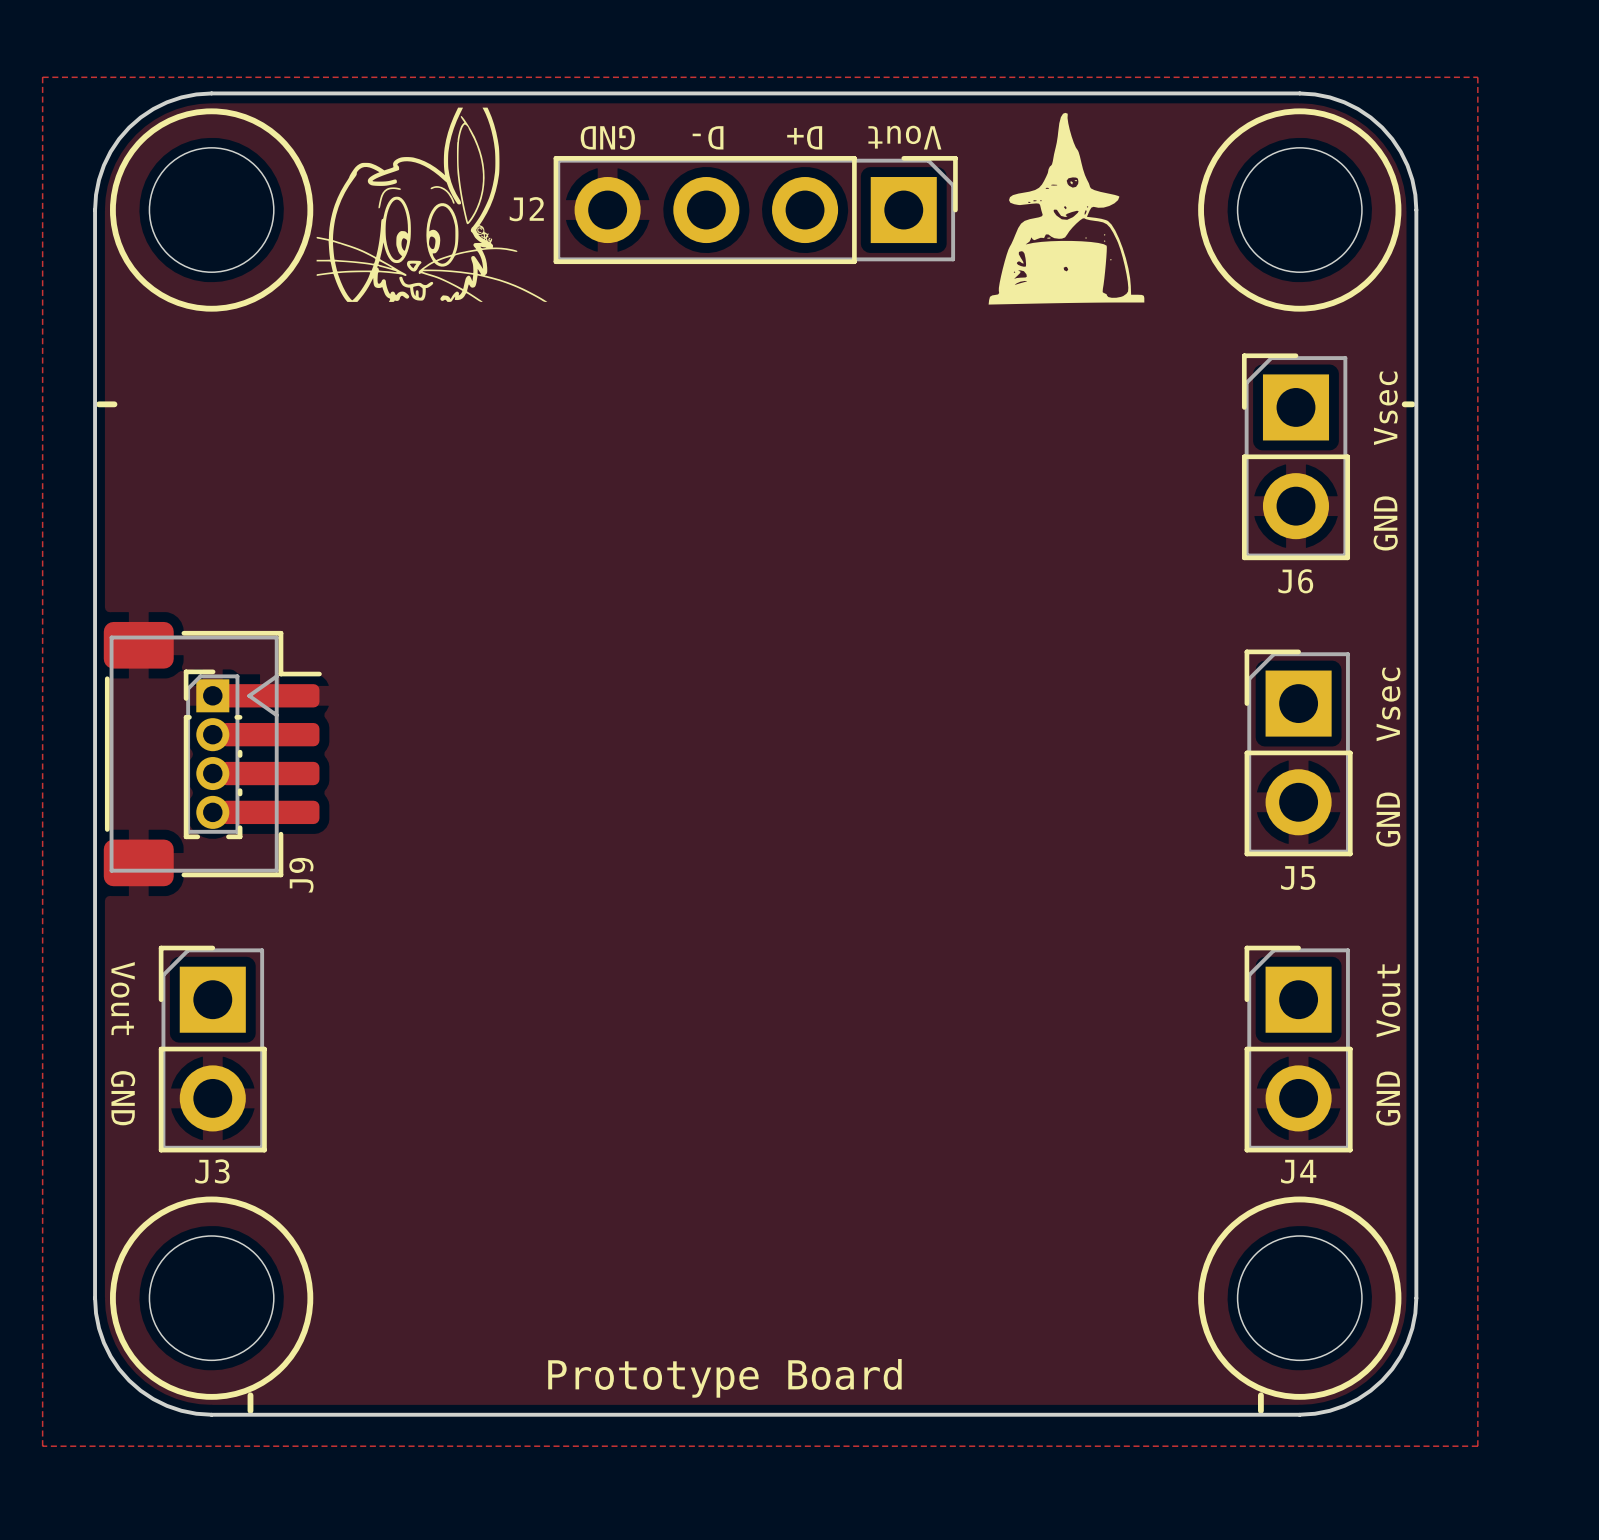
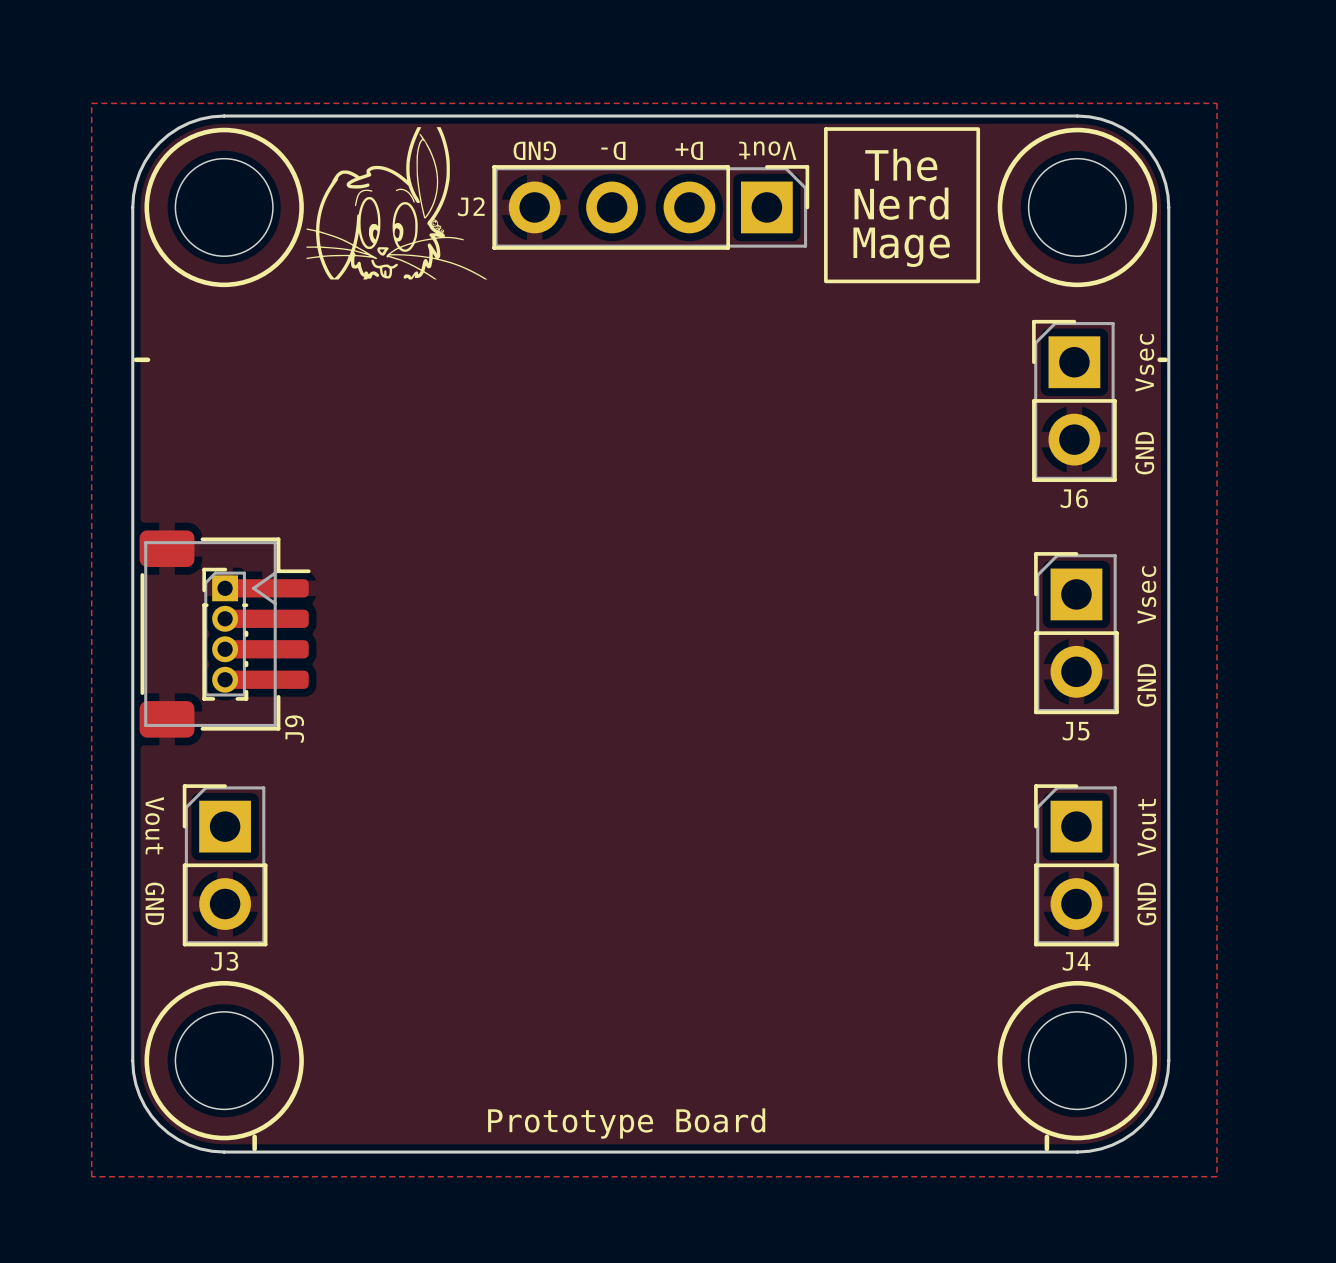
drawing shape: [988, 112, 1145, 305] -> [824, 127, 981, 284]

